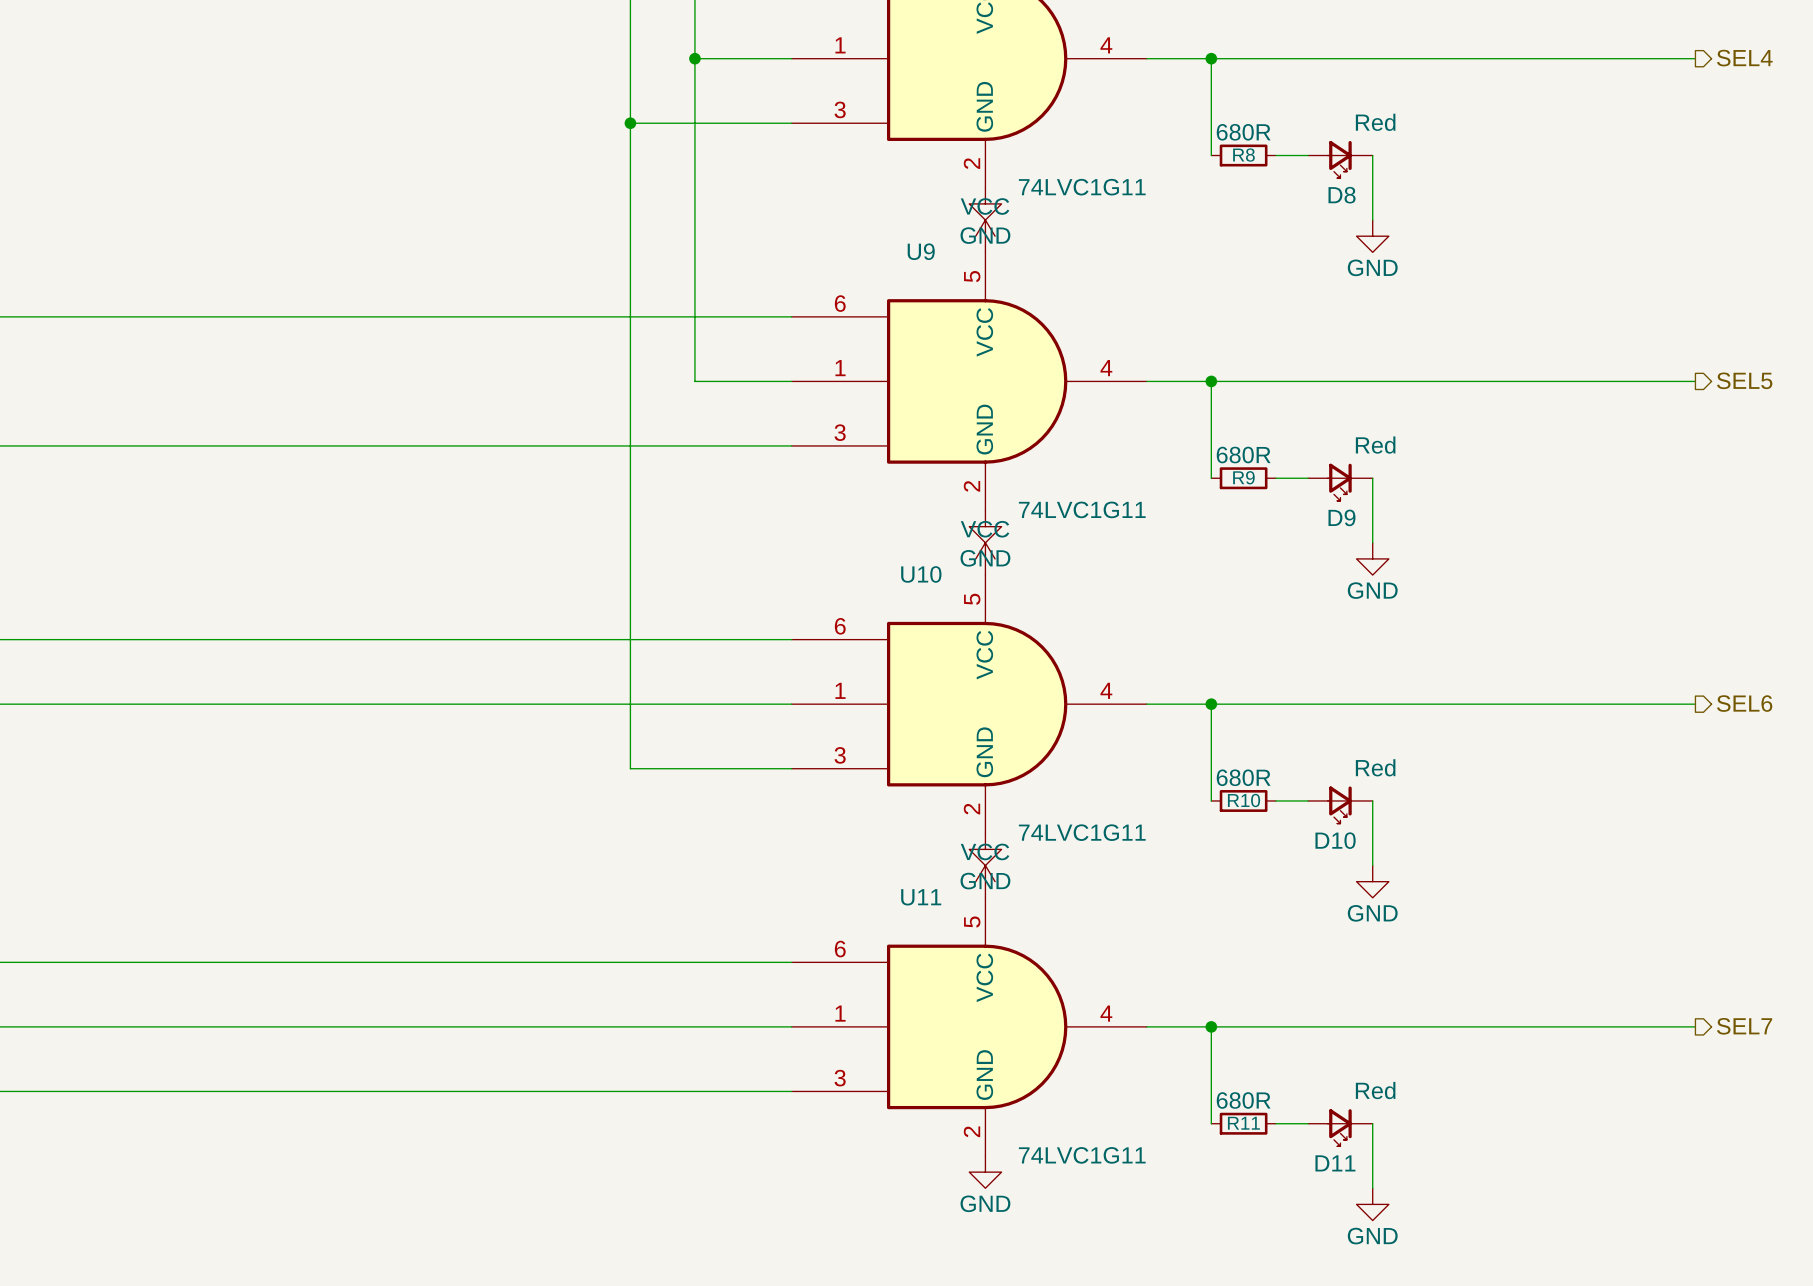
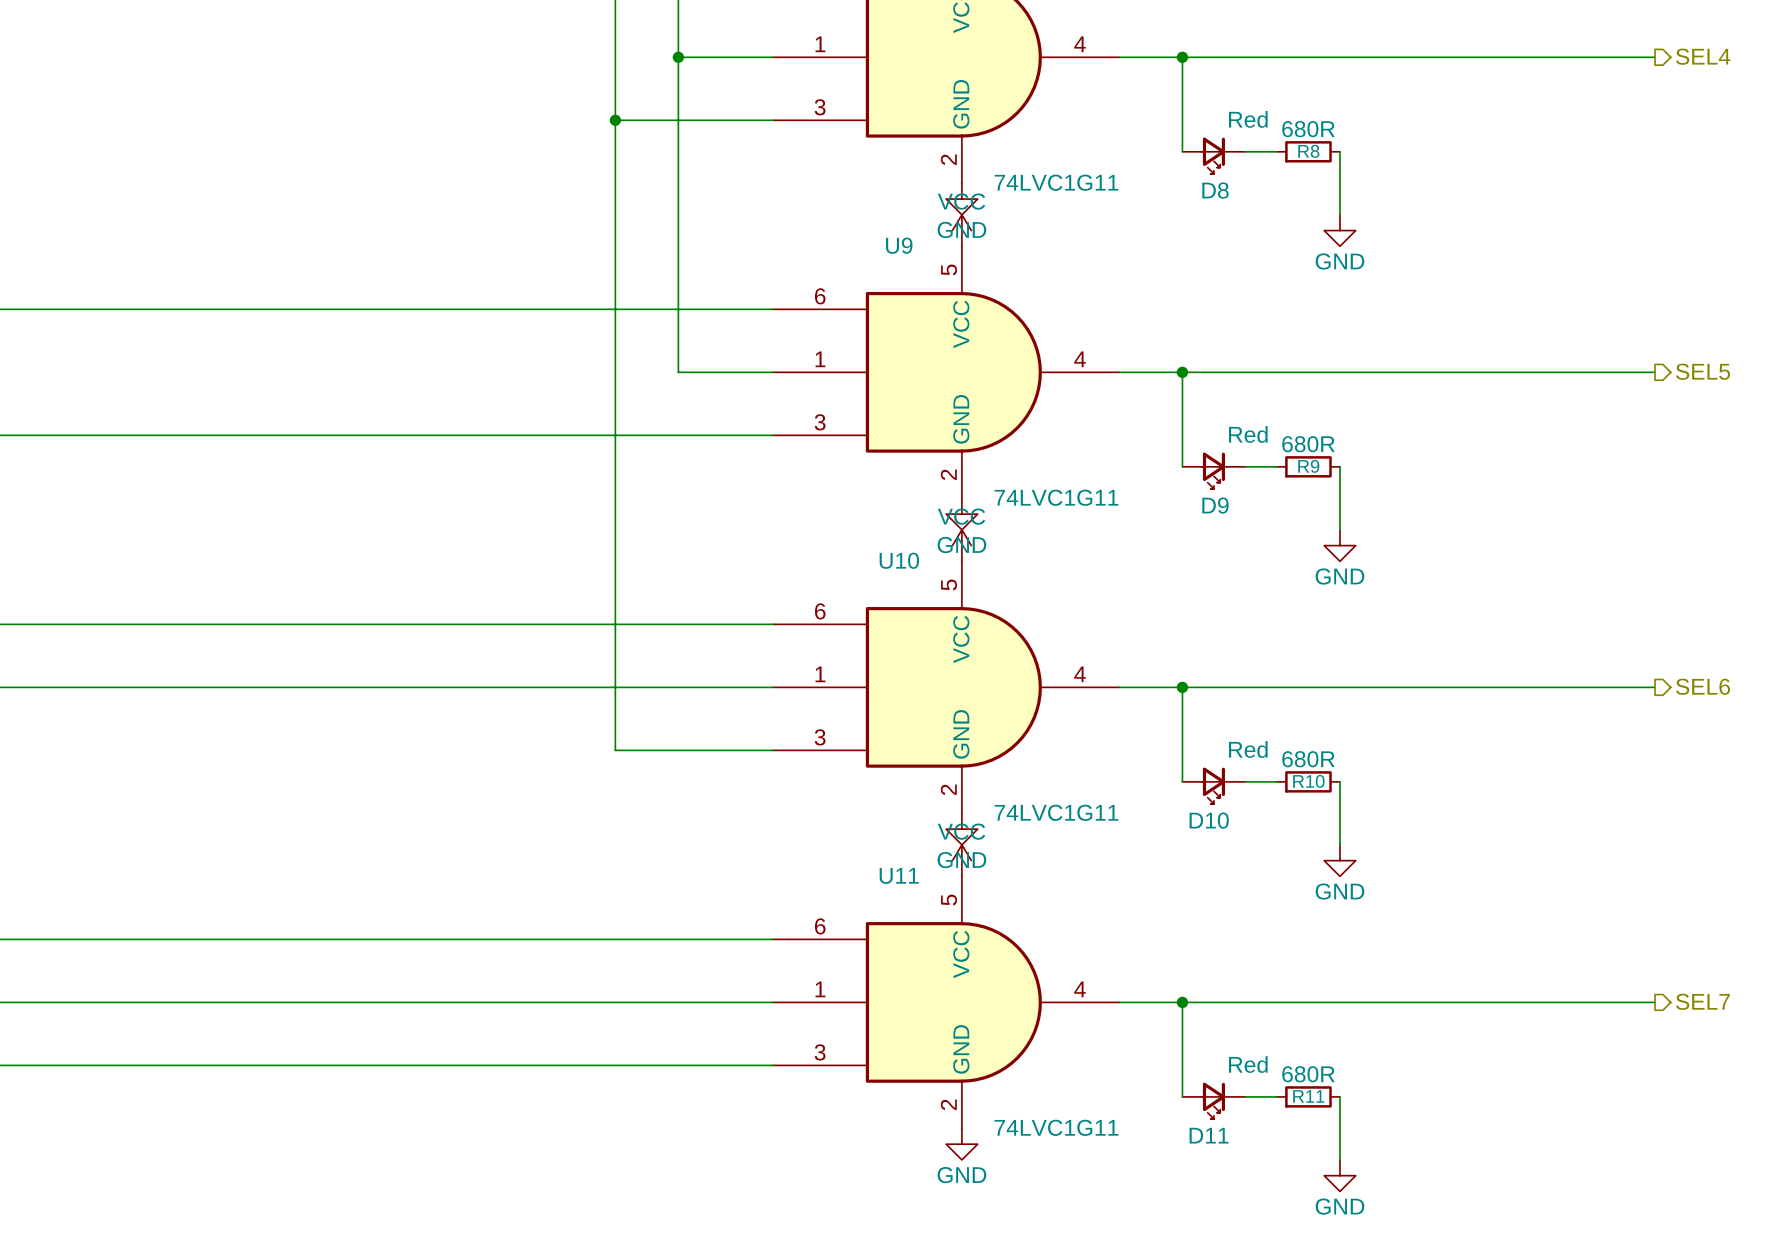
R8 position: (1243, 155) -> (1308, 151)
D8 position: (1340, 159) -> (1213, 155)
R9 position: (1243, 478) -> (1308, 466)
D9 position: (1340, 482) -> (1213, 470)
R10 position: (1243, 800) -> (1308, 781)
D10 position: (1340, 805) -> (1213, 785)
R11 position: (1243, 1123) -> (1308, 1096)
D11 position: (1340, 1127) -> (1213, 1100)

